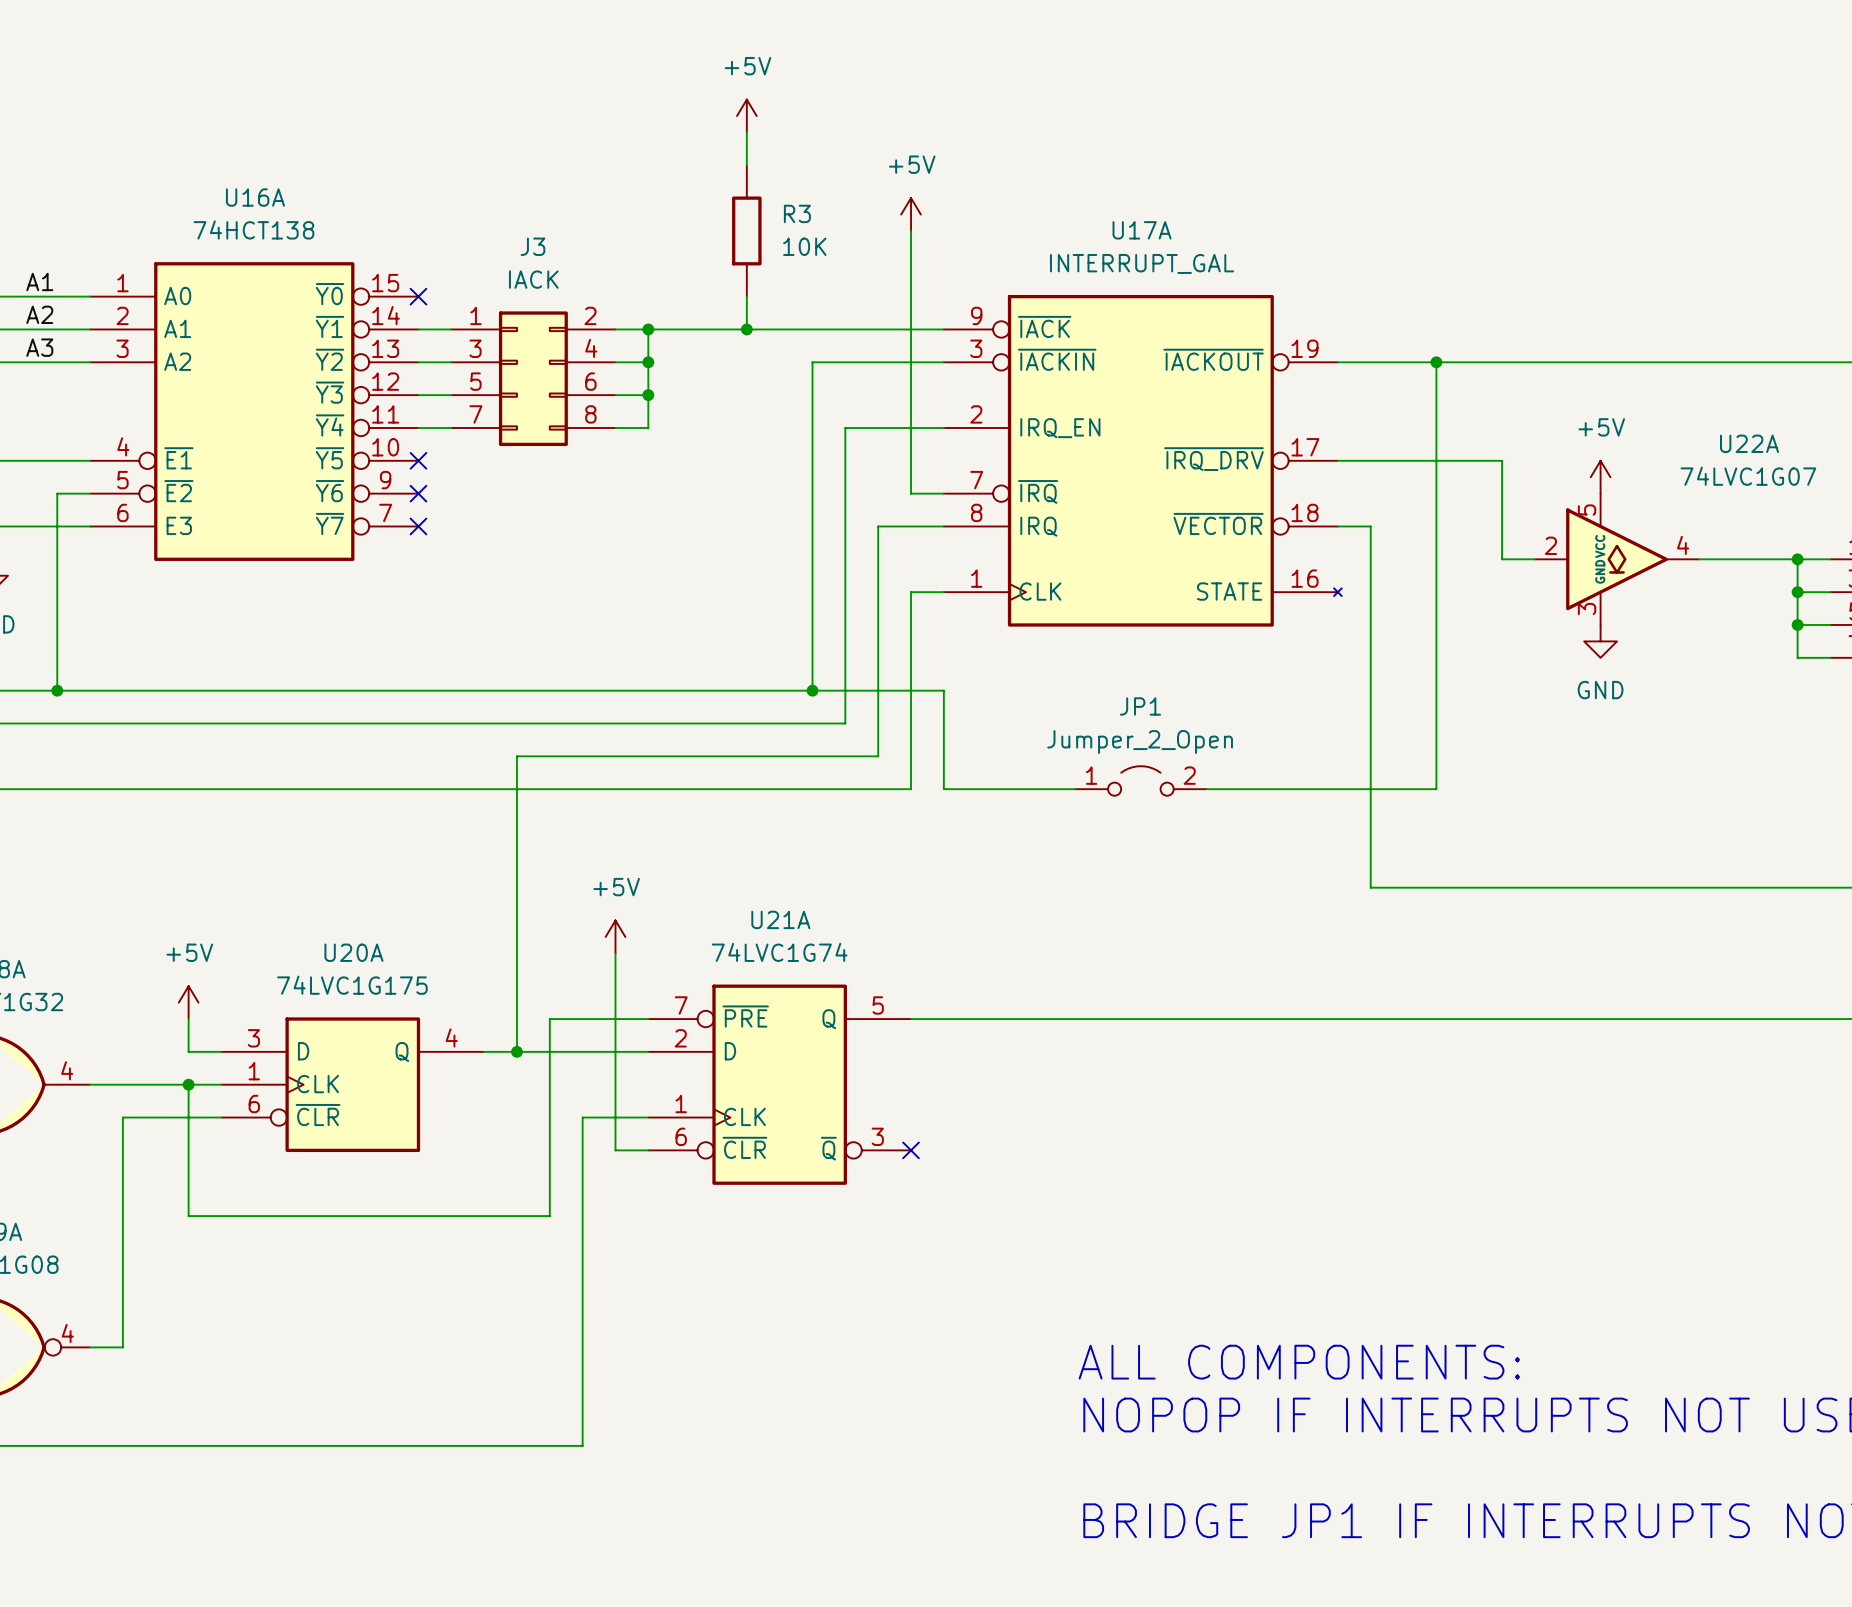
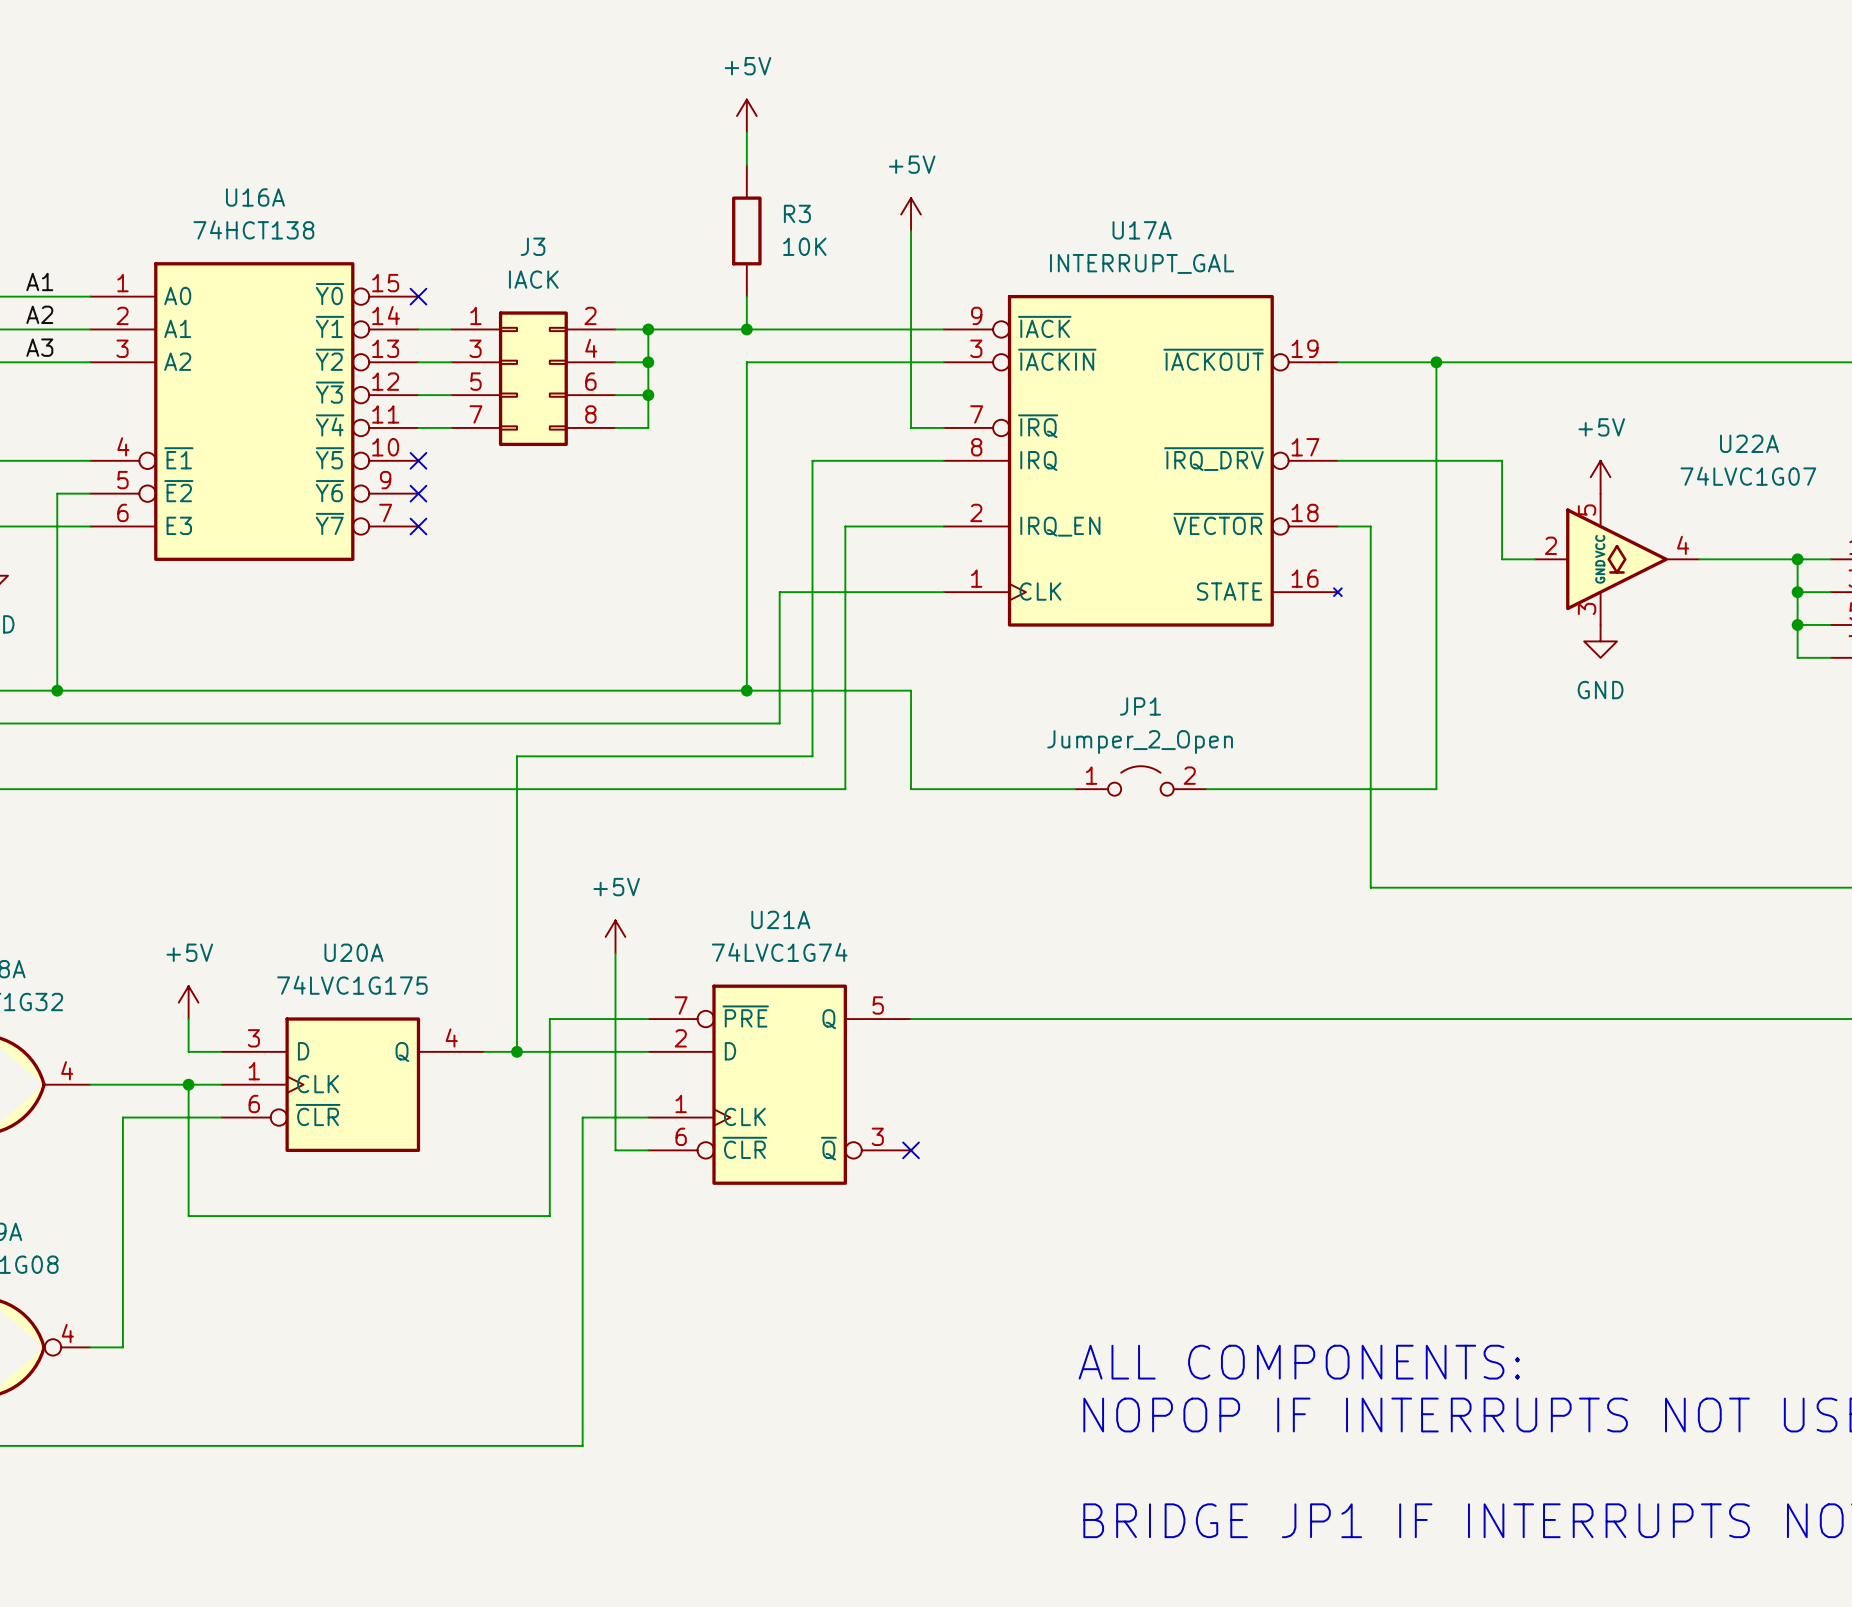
U17A symbol: [943, 294, 1342, 627] -> [943, 294, 1342, 627]
wire: (812, 362) (812, 460) -> (943, 460) (812, 460)
wire: none -> (812, 362) (746, 362) (746, 690)
wire: (943, 493) (911, 493) (911, 427) (845, 427) (845, 526) -> (878, 526) (845, 526)
wire: (878, 526) (878, 756) (812, 756) -> (812, 690) (812, 756)
wire: (911, 592) (911, 690) (943, 690) (943, 789) -> (911, 592) (779, 592) (779, 723)
junction position: (812, 690) -> (746, 690)
wire: (779, 723) (845, 723) -> (845, 789) (845, 723)
wire: (845, 789) (911, 789) -> (943, 789) (911, 789)

